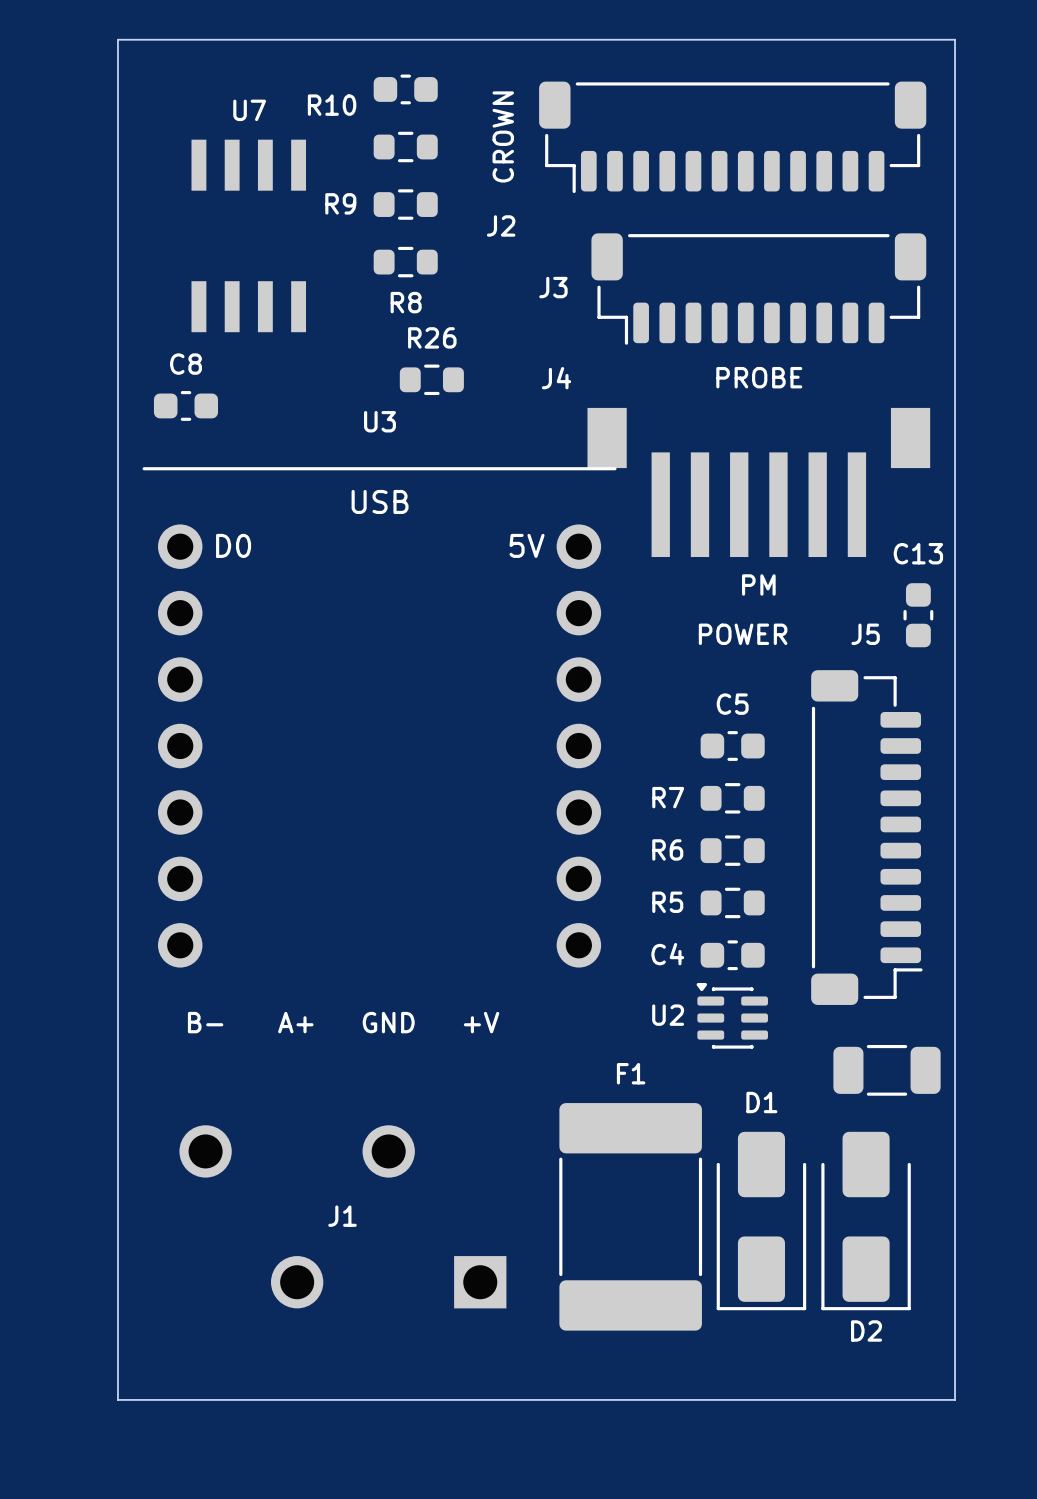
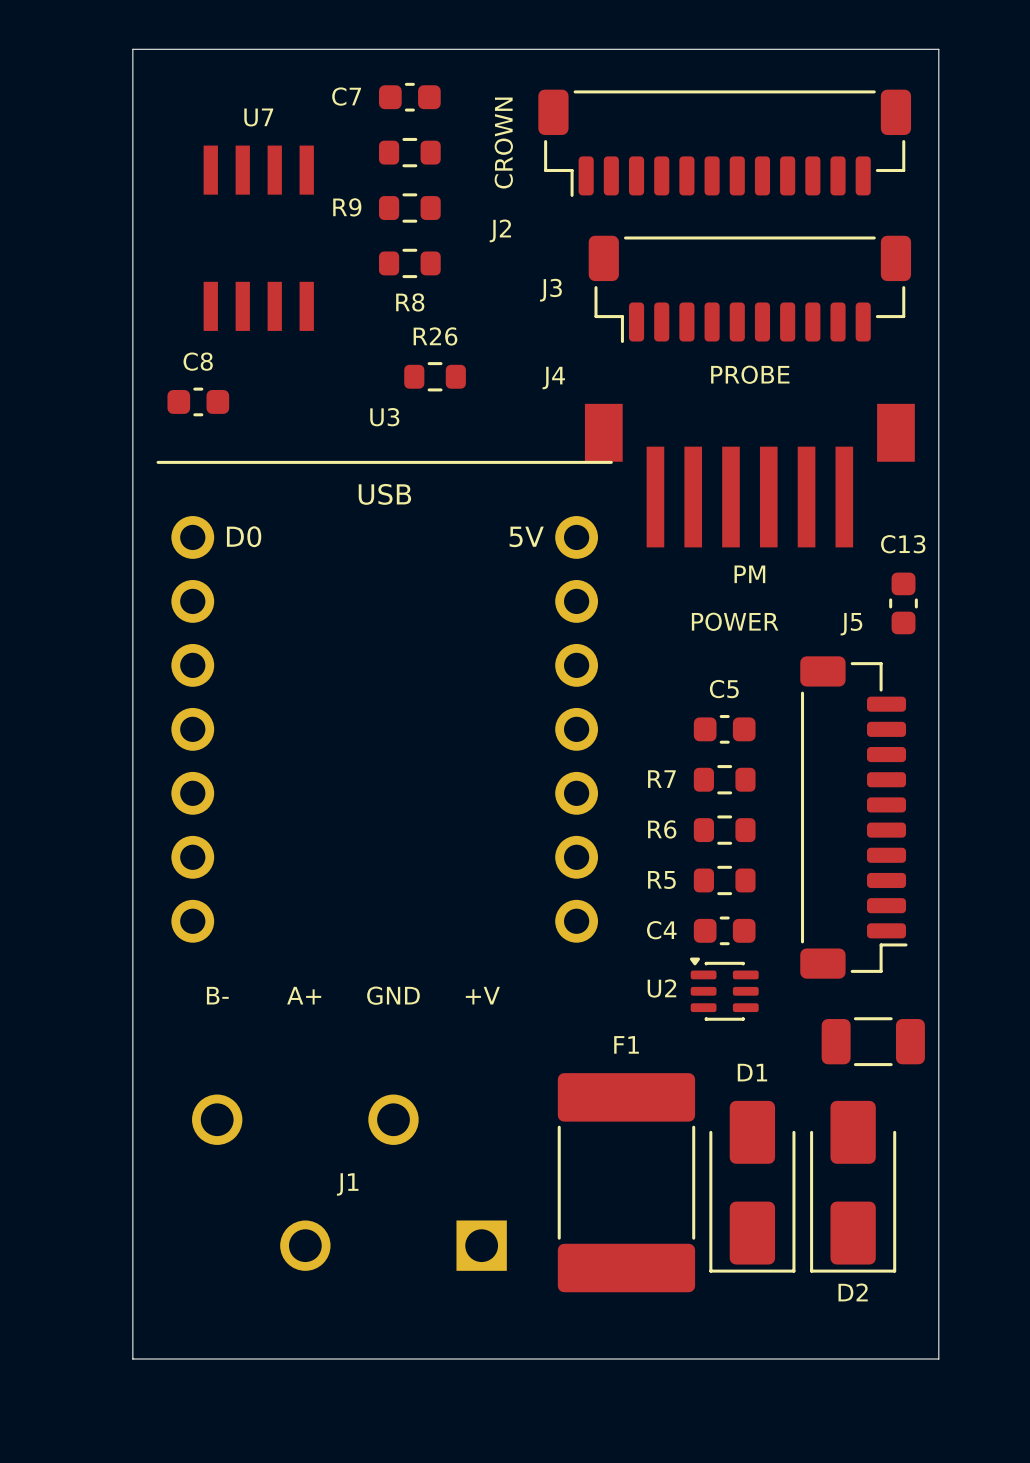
C7 name: none -> C7 (346, 96)
R10 name: R10 (332, 105) -> none

